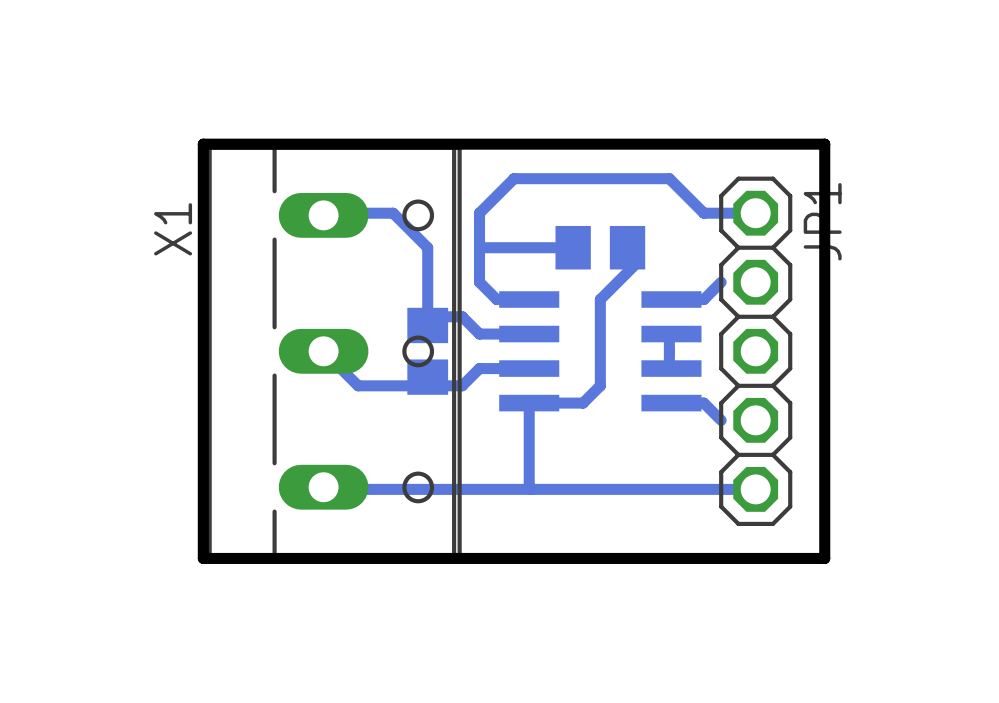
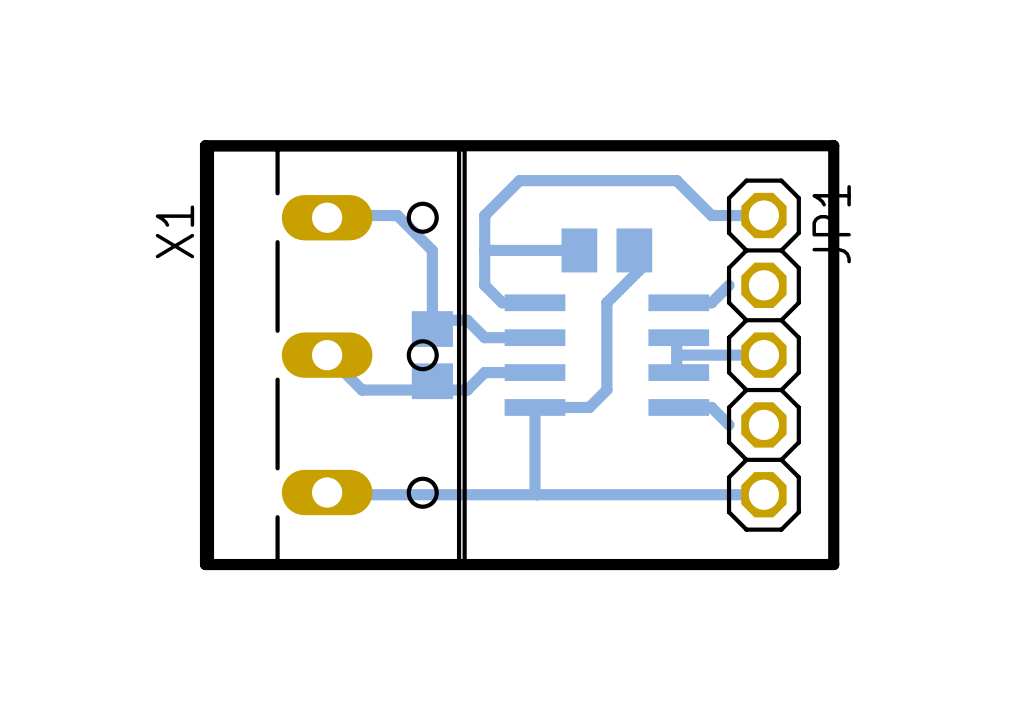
bottom track: none -> (676, 355) (763, 355)

